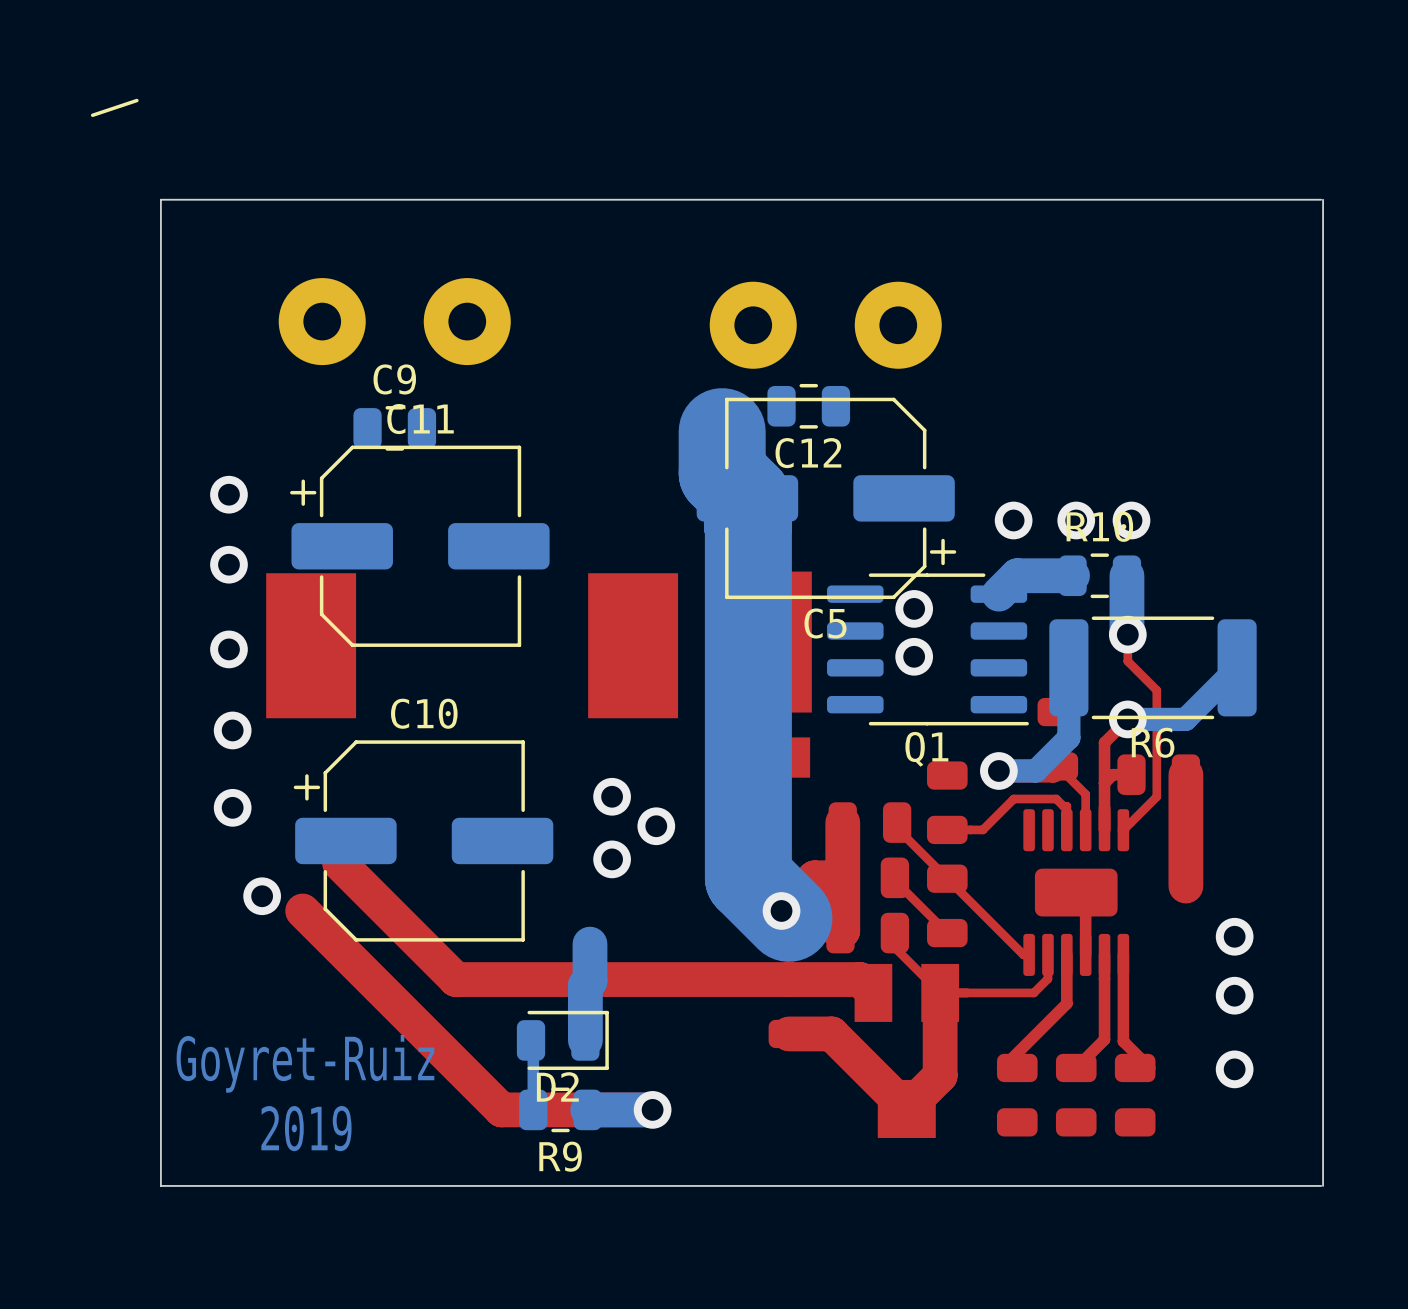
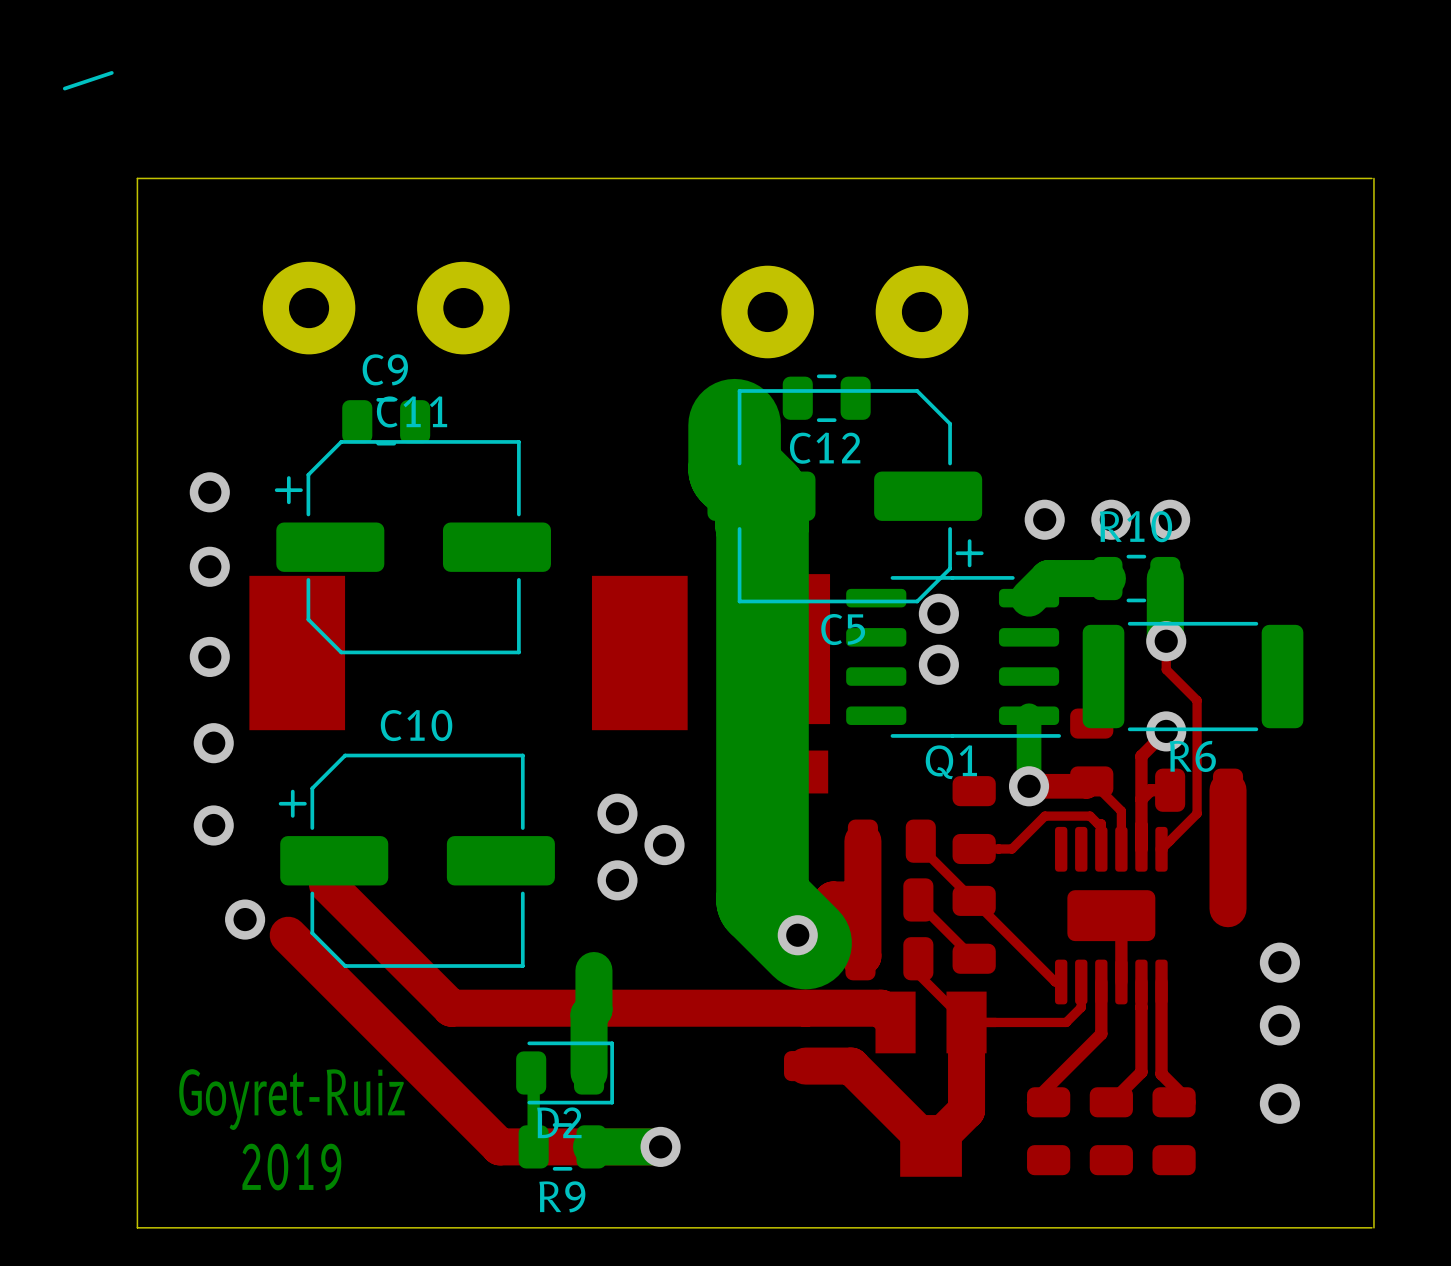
bottom track: (1068, 667) (1068, 737) (1035, 770) (998, 770) -> (1029, 715) (1029, 786)
bottom track: (1237, 667) (1185, 719) (1127, 719) -> none

